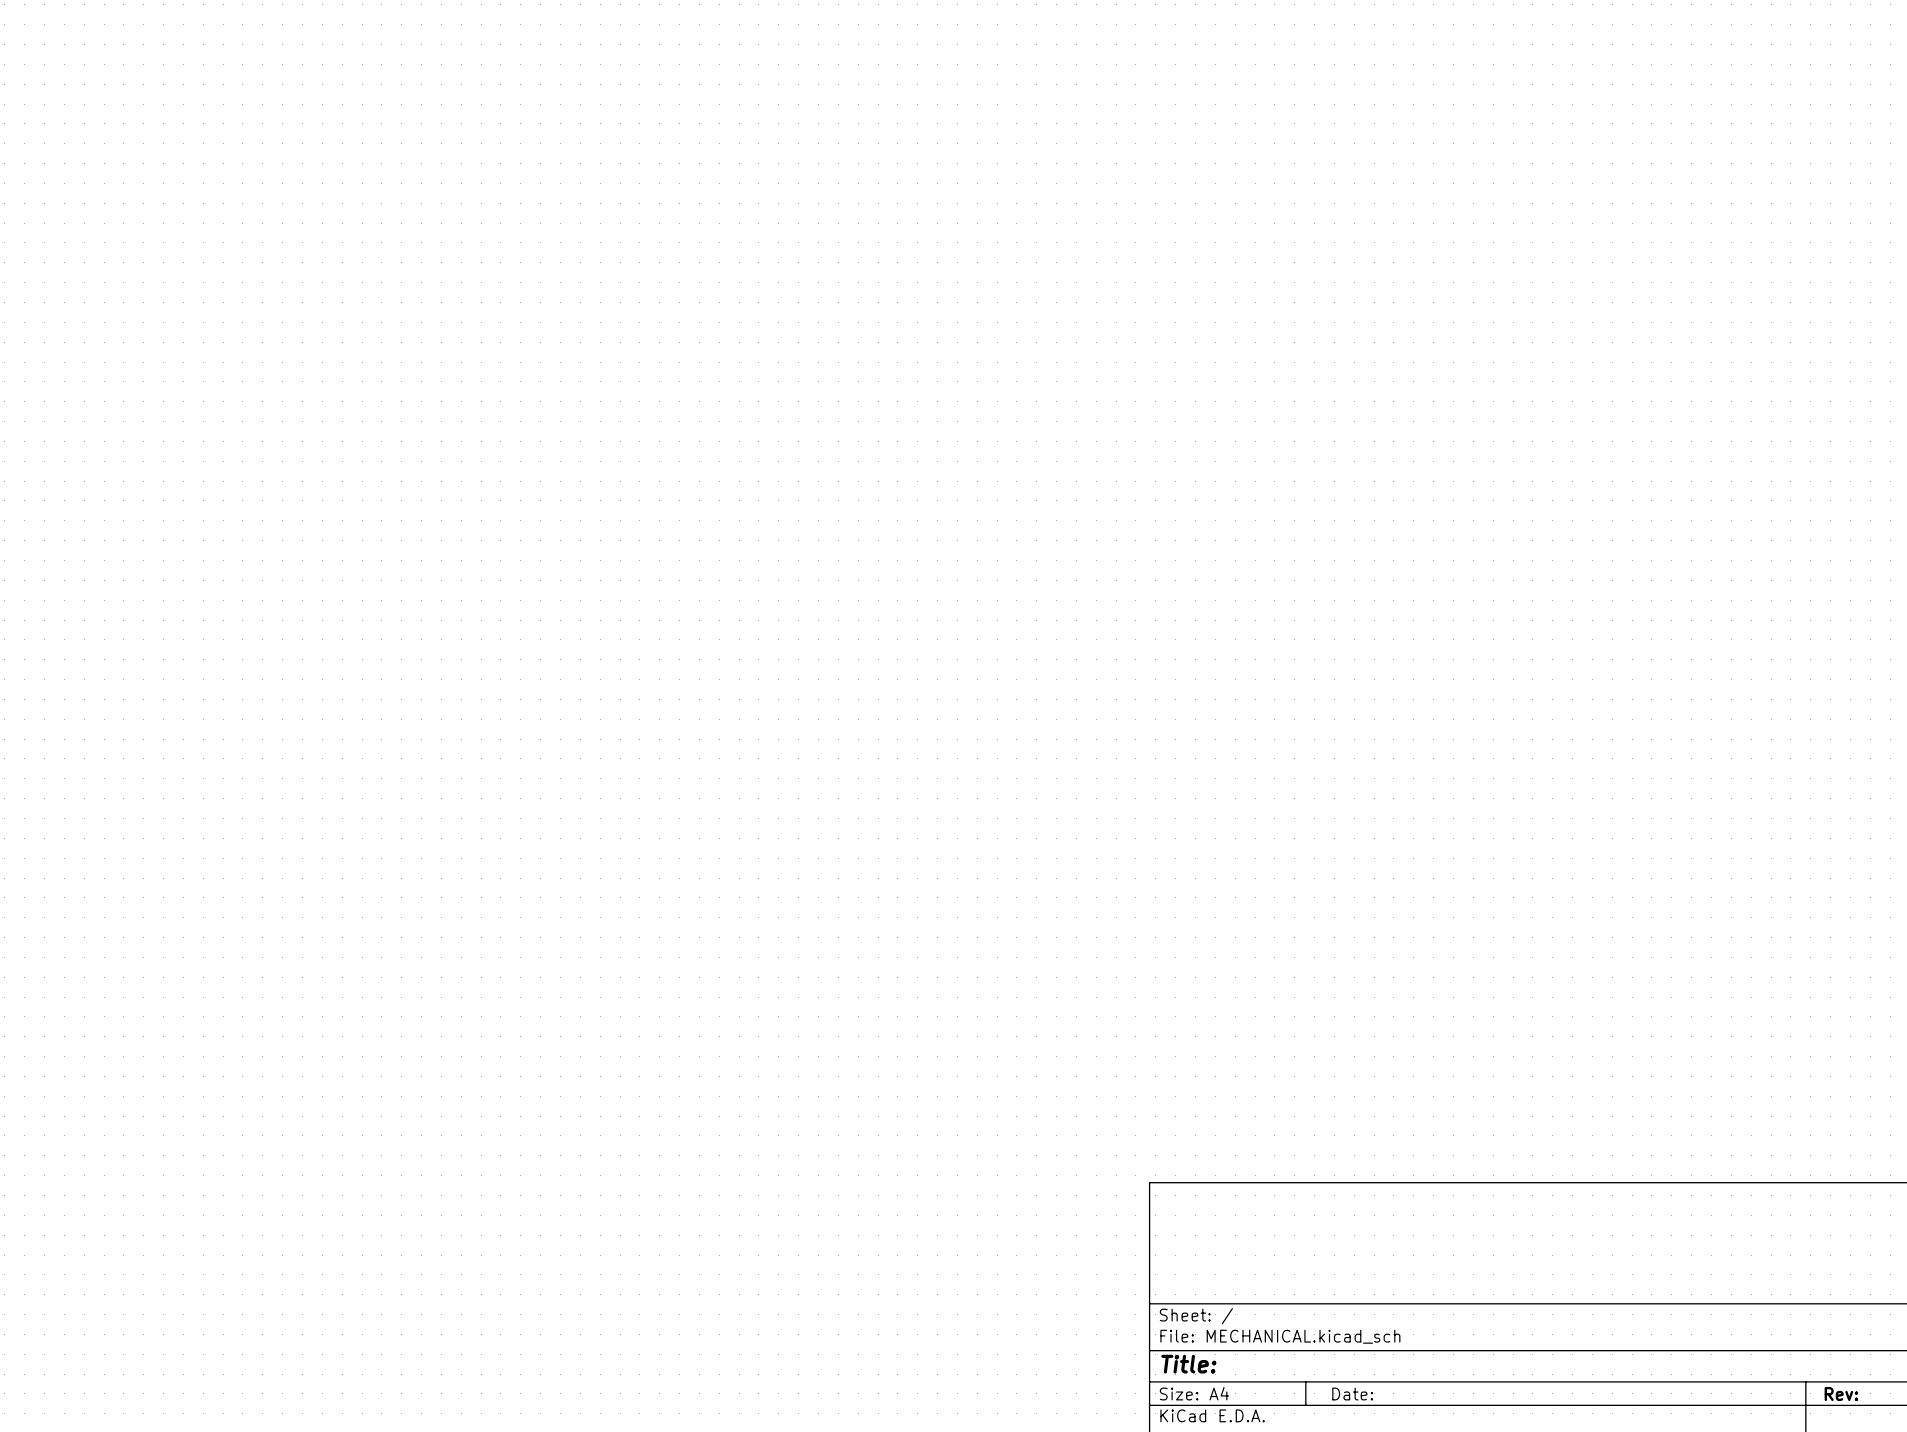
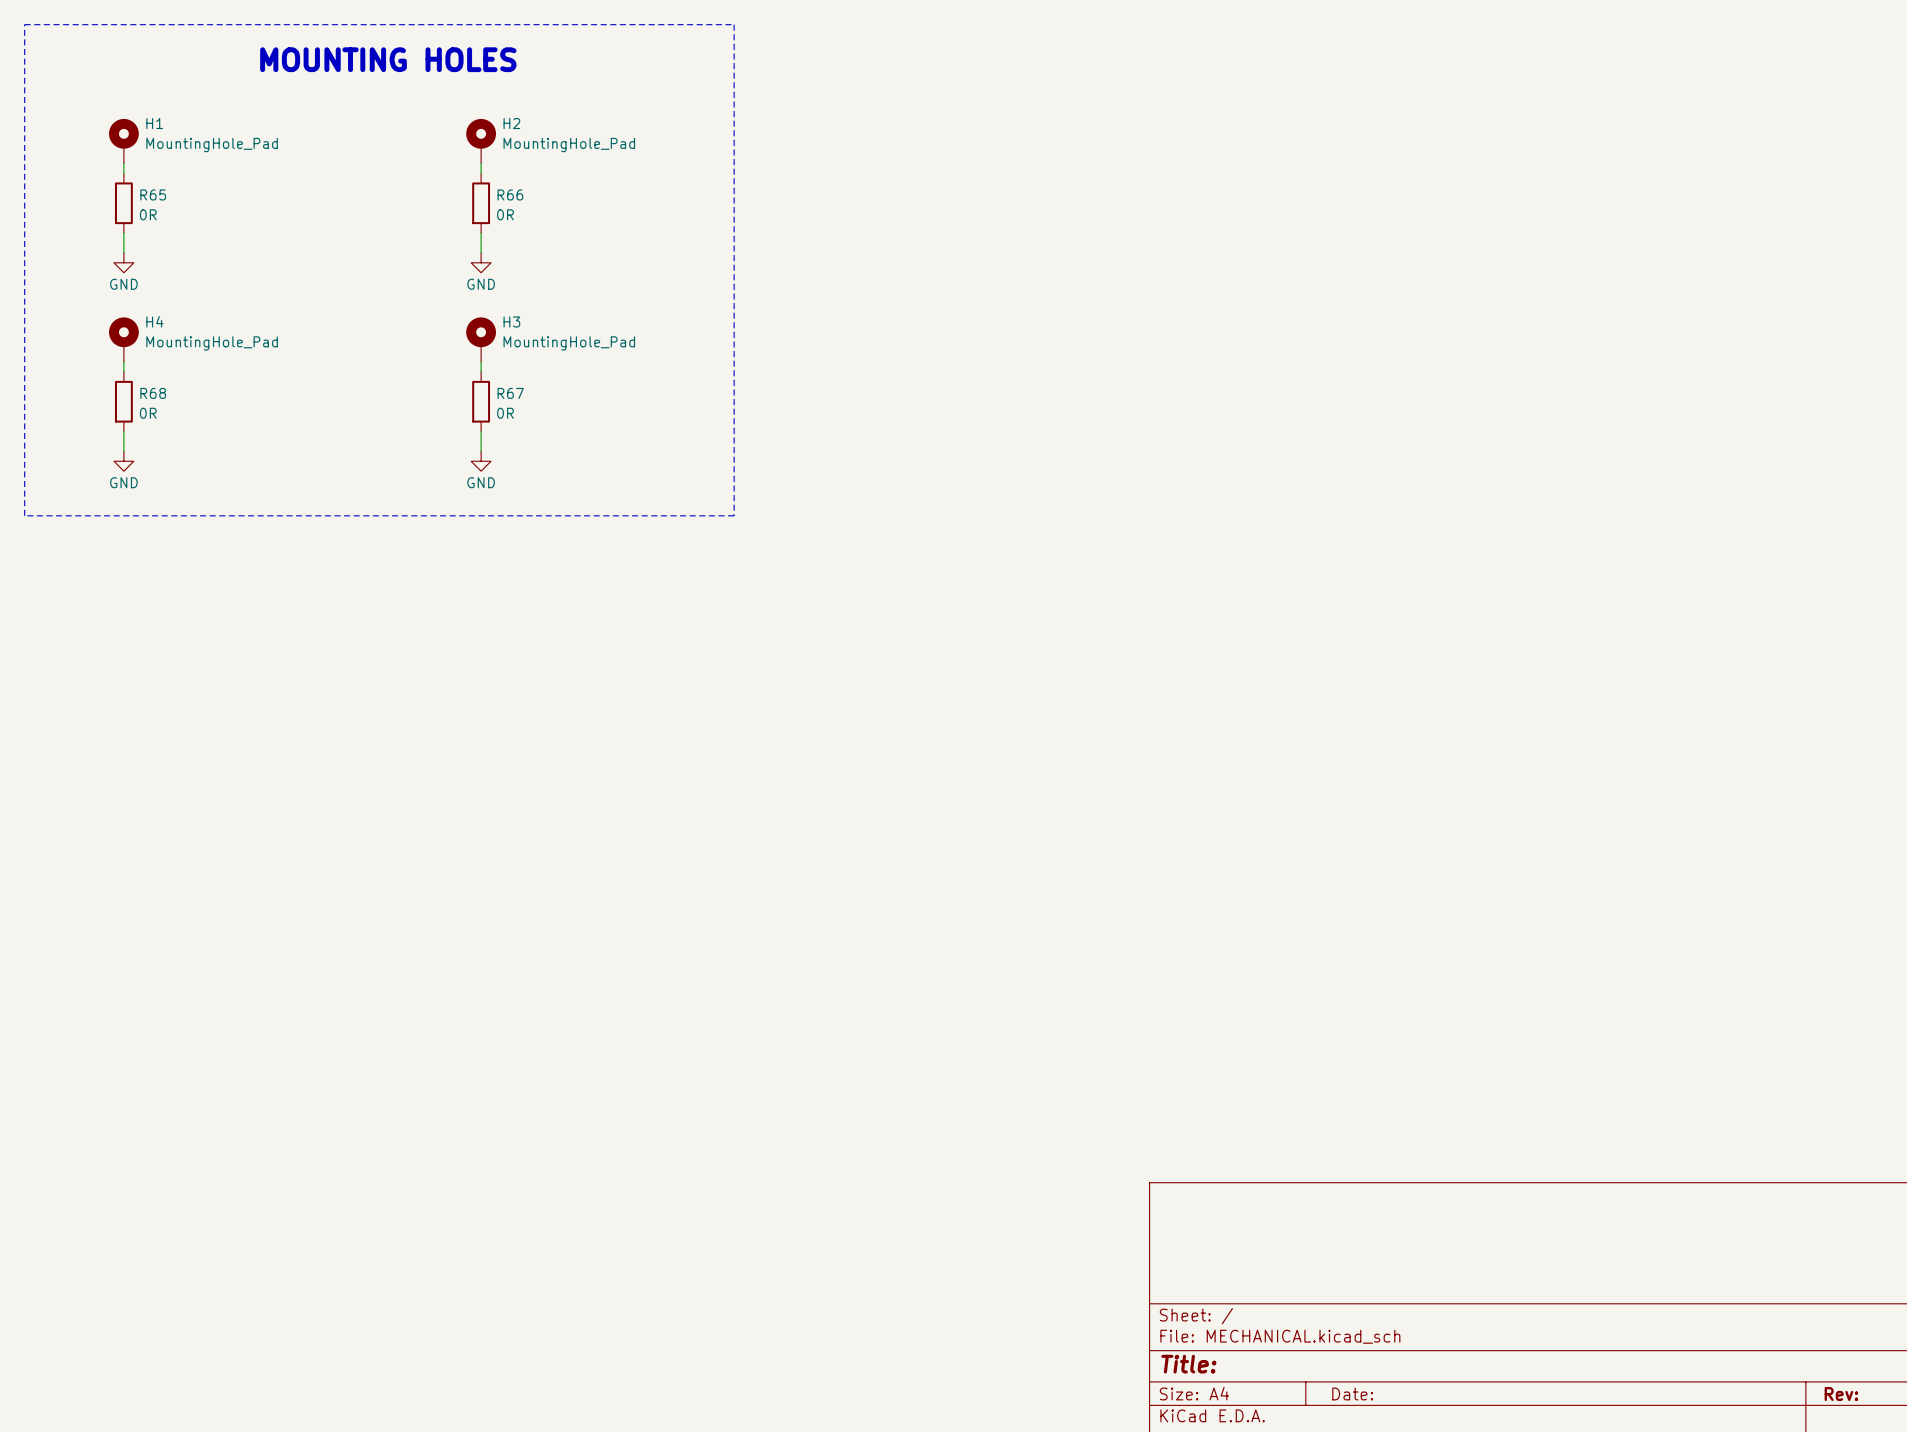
line: none -> (24, 24) (734, 24) (734, 515) (24, 515) (24, 24)
text: none -> MOUNTING HOLES (388, 59)
H1: none -> MountingHole_Pad (123, 141)
H2: none -> MountingHole_Pad (481, 141)
wire: none -> (123, 163) (123, 173)
wire: none -> (481, 163) (481, 173)
R65: none -> 0R (123, 203)
R66: none -> 0R (481, 203)
wire: none -> (123, 233) (123, 252)
wire: none -> (481, 233) (481, 252)
power symbol: none -> GND (123, 262)
power symbol: none -> GND (481, 262)
H4: none -> MountingHole_Pad (123, 339)
H3: none -> MountingHole_Pad (481, 339)
wire: none -> (123, 362) (123, 371)
wire: none -> (481, 362) (481, 371)
R68: none -> 0R (123, 401)
R67: none -> 0R (481, 401)
wire: none -> (123, 431) (123, 451)
wire: none -> (481, 431) (481, 451)
power symbol: none -> GND (123, 461)
power symbol: none -> GND (481, 461)

